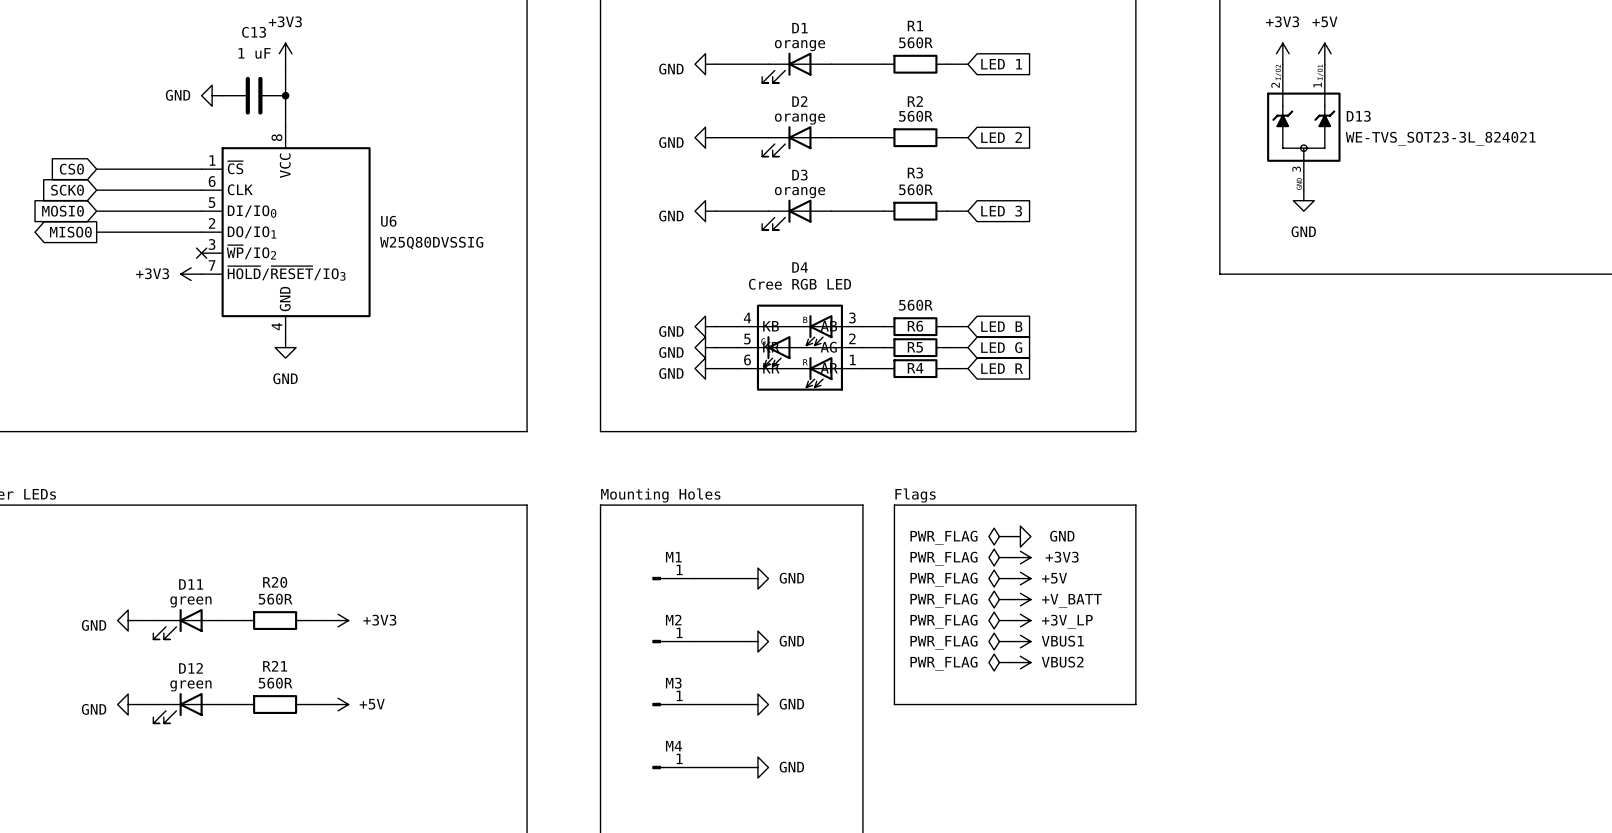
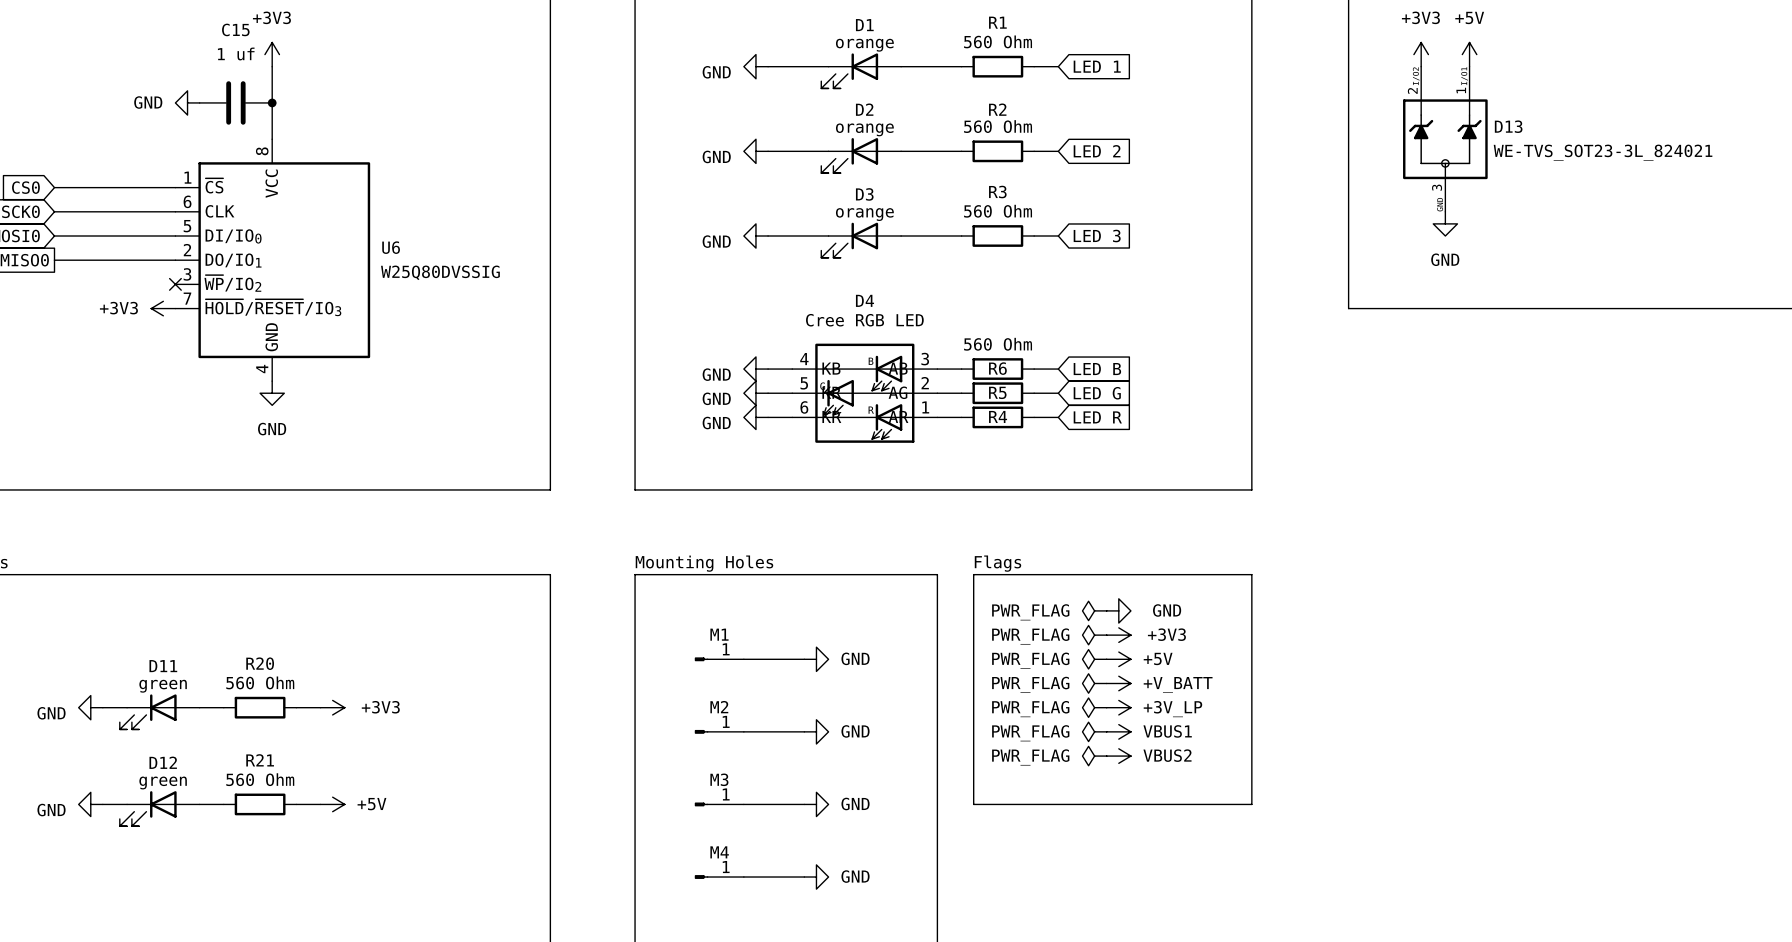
C13 name: C13 (254, 32) -> C15 (235, 29)
R1 value: 560R (915, 42) -> 560 Ohm (998, 41)
C13 value: 1 uF (254, 53) -> 1 uf (236, 53)
R2 value: 560R (915, 116) -> 560 Ohm (998, 126)
R3 value: 560R (915, 189) -> 560 Ohm (998, 211)
R6 value: 560R (915, 305) -> 560 Ohm (998, 344)
R20 value: 560R (275, 599) -> 560 Ohm (260, 682)
R21 value: 560R (275, 683) -> 560 Ohm (260, 779)

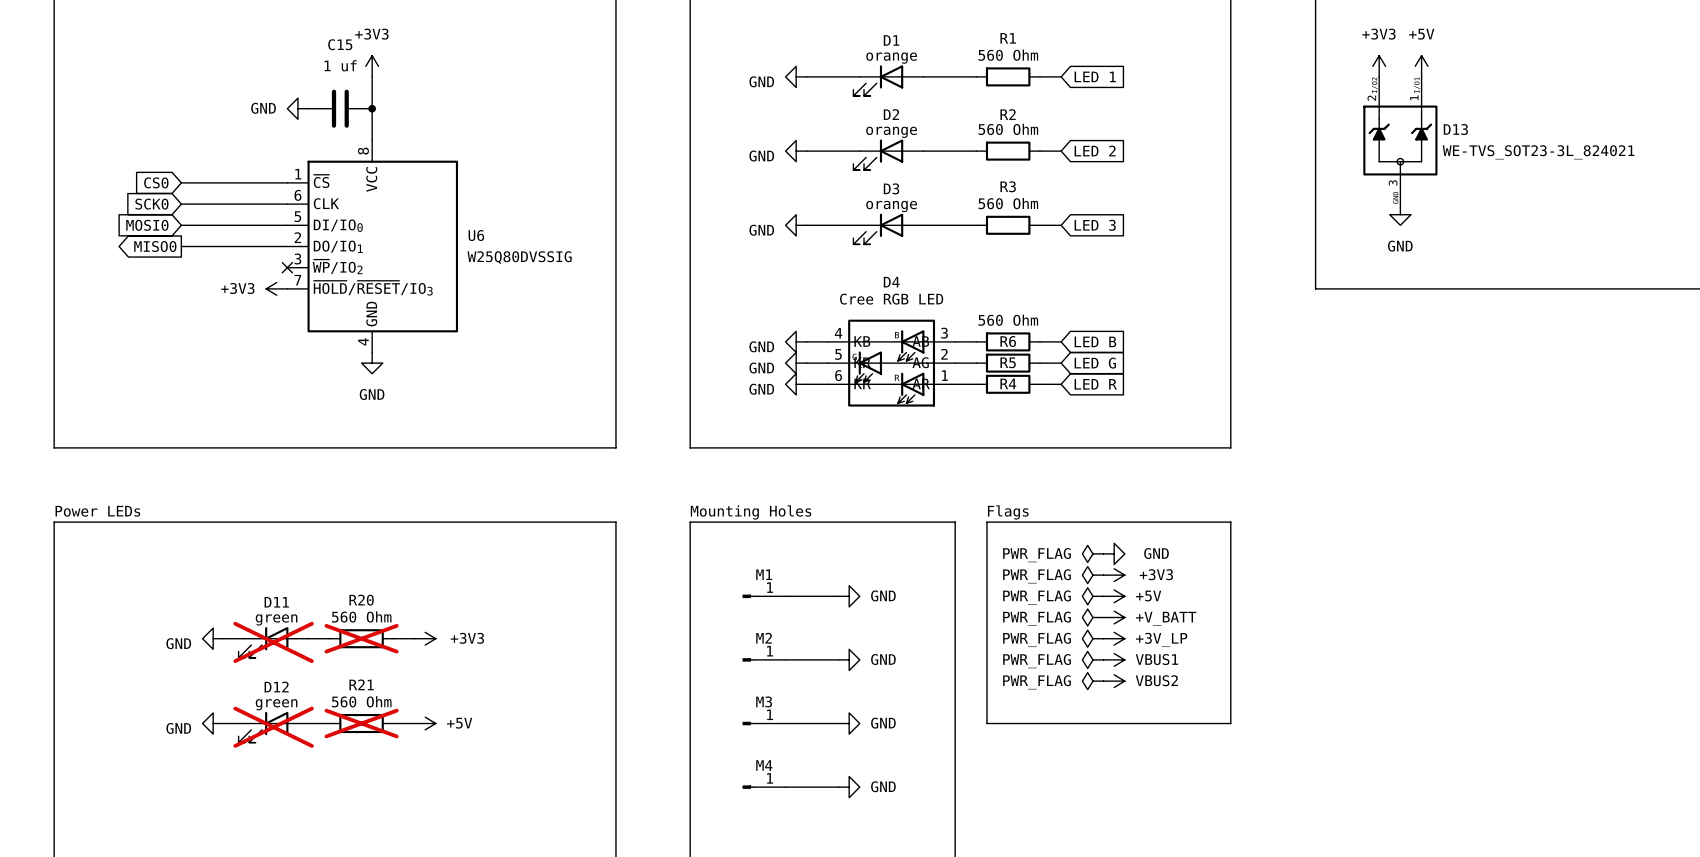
R20 do-not-place cross: none -> (361, 638)
D11 do-not-place cross: none -> (273, 642)
R21 do-not-place cross: none -> (361, 723)
D12 do-not-place cross: none -> (273, 727)

